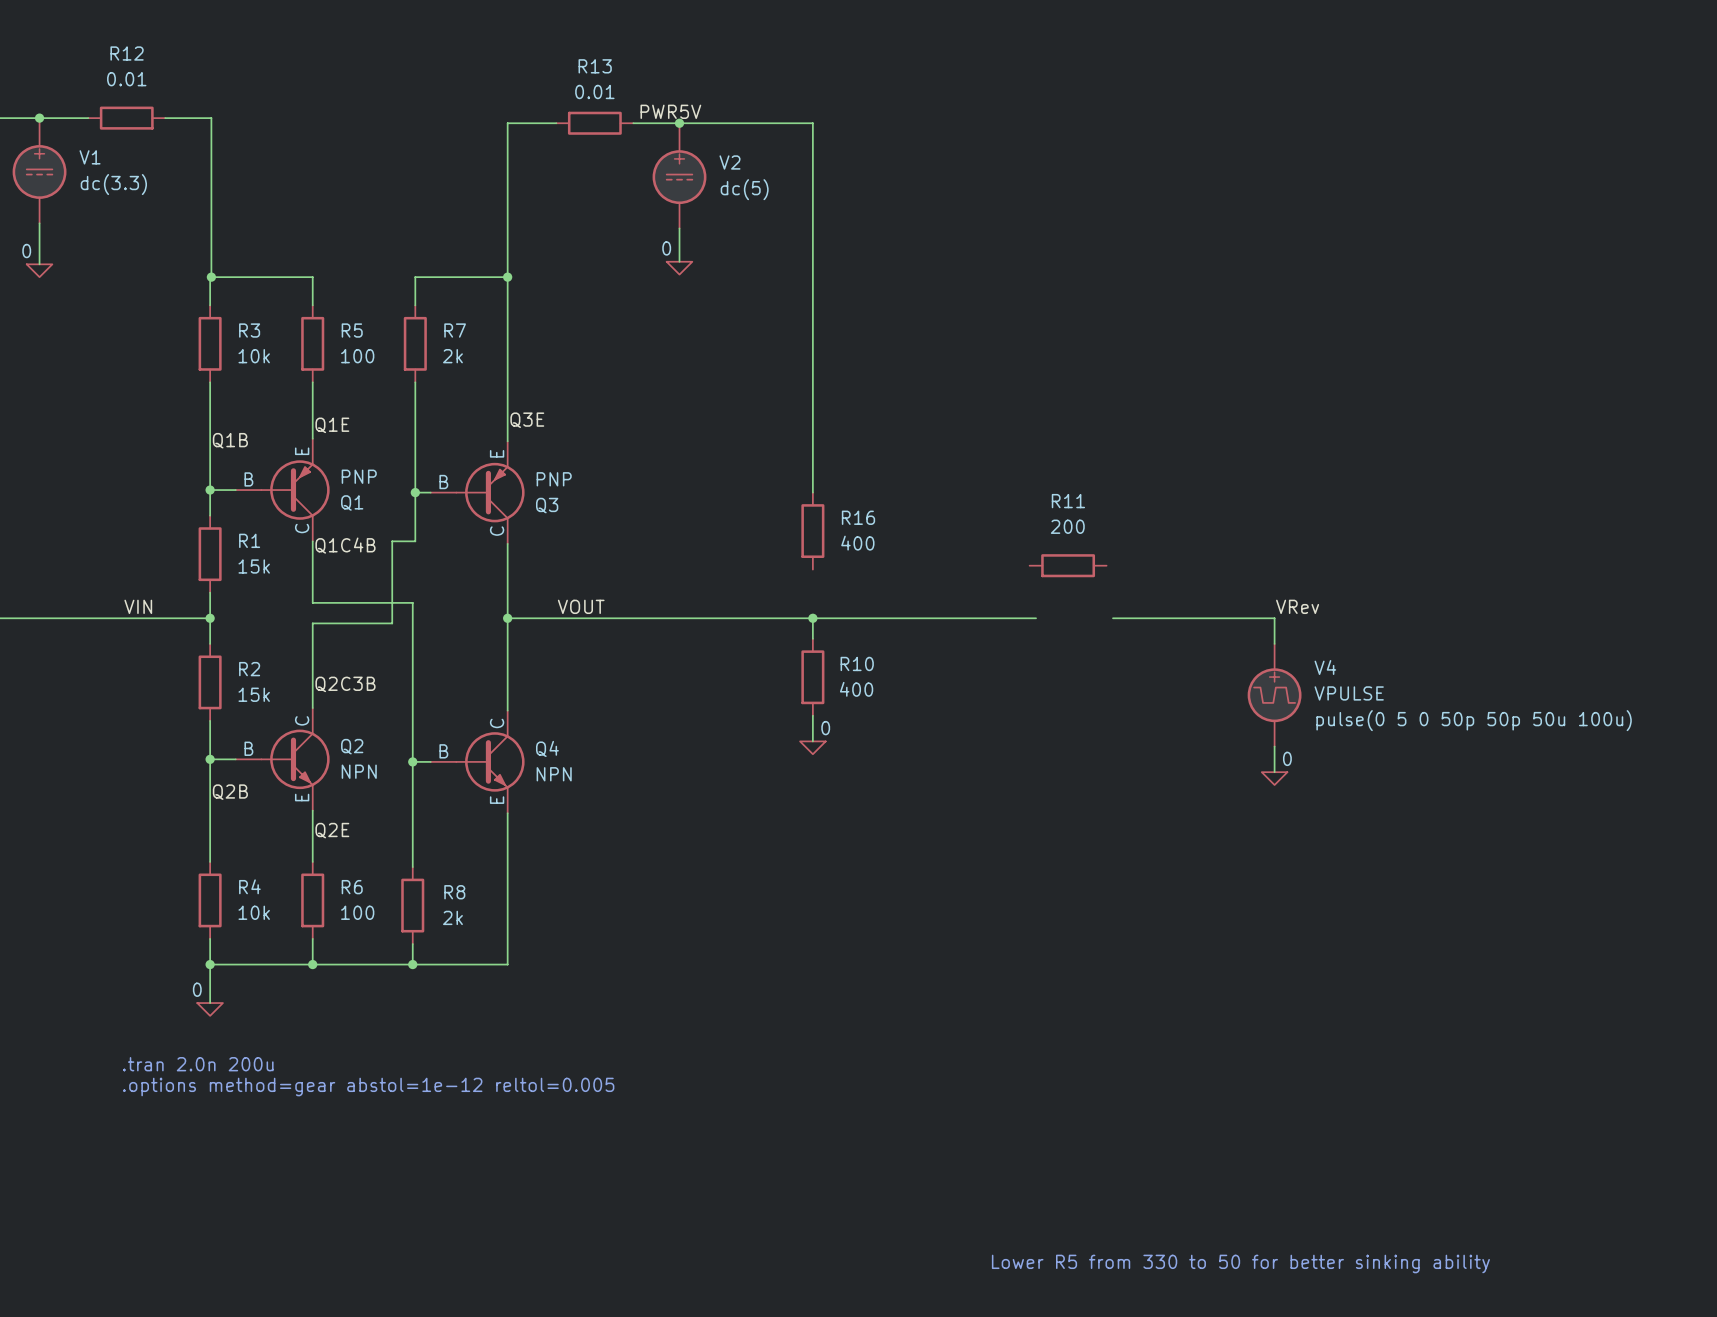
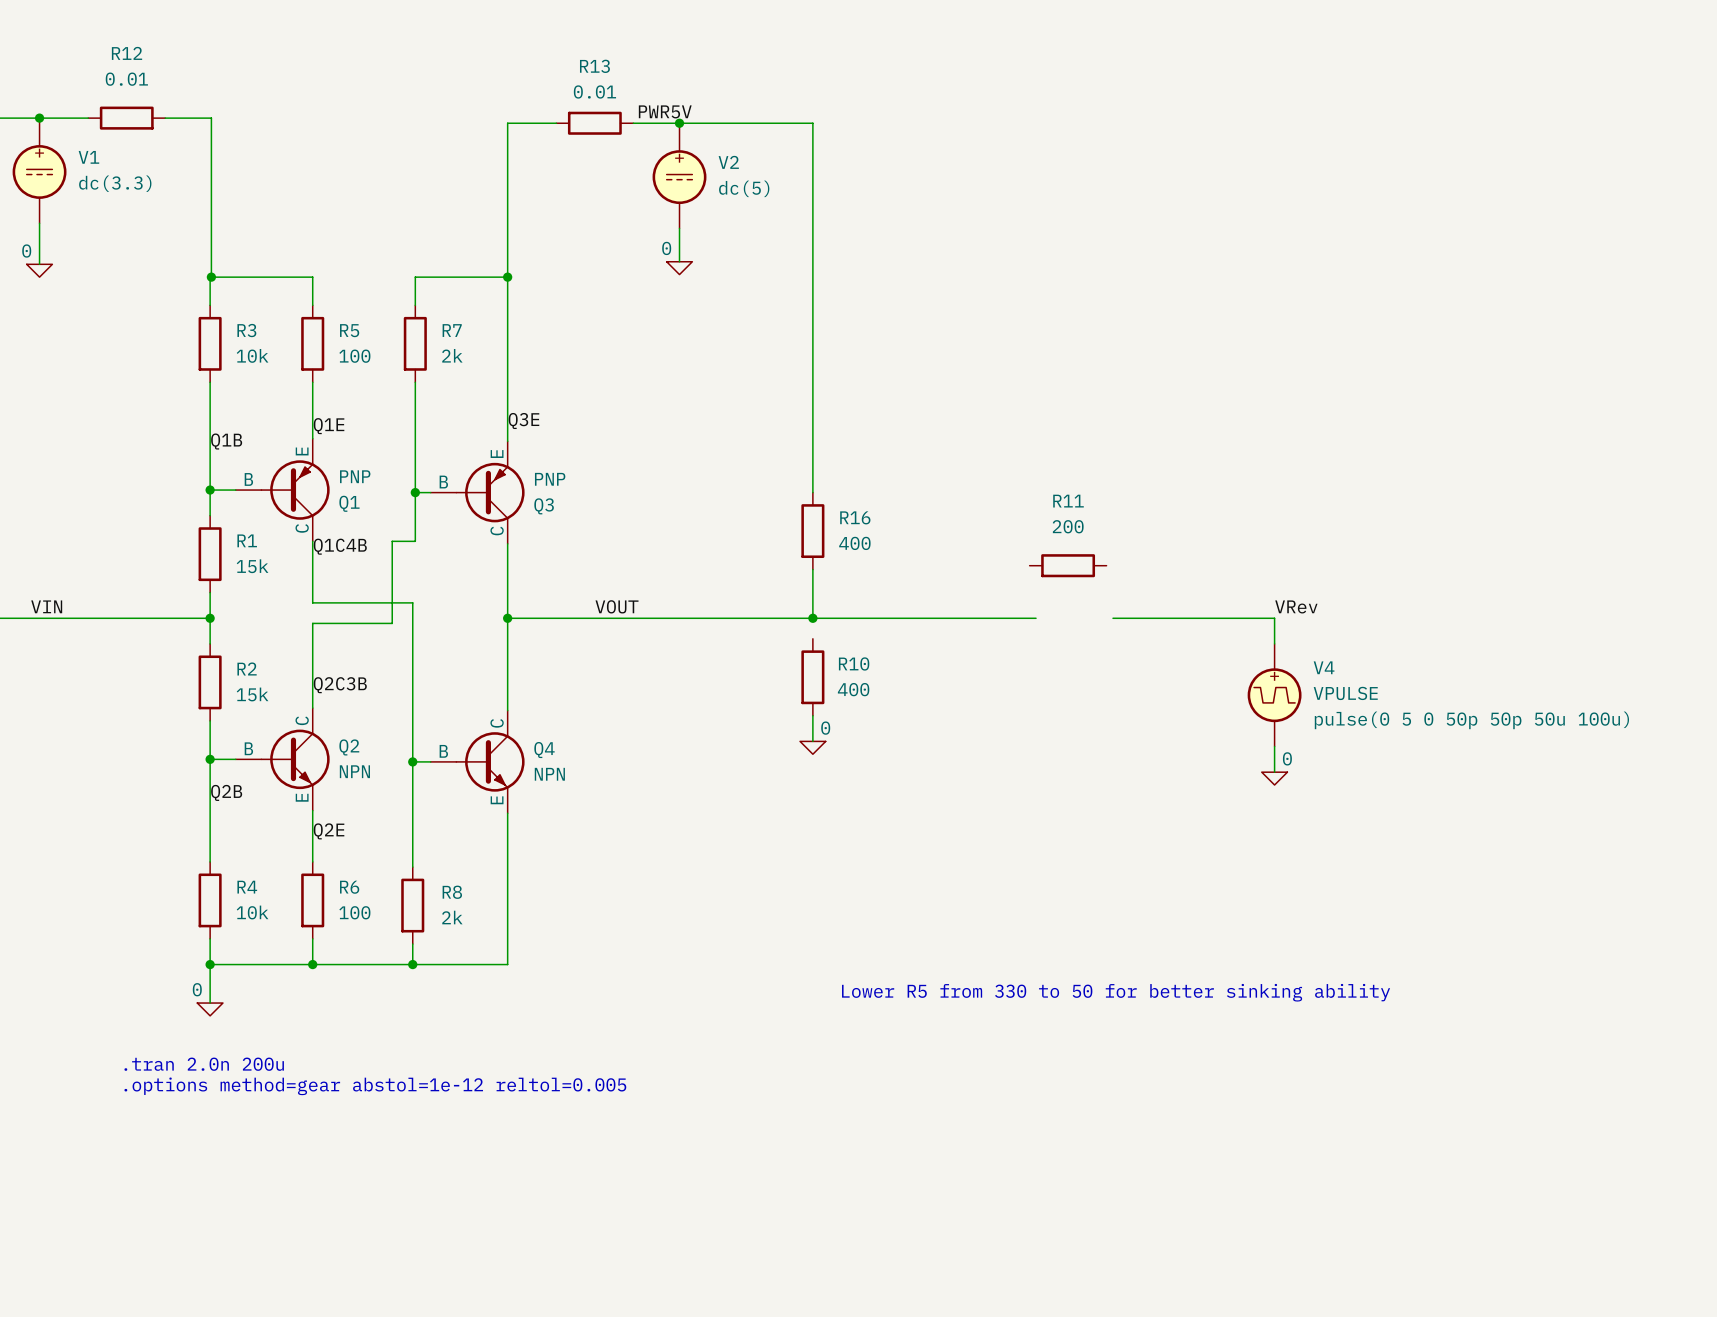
label position: VIN (138, 606) -> VIN (46, 606)
label position: VOUT (581, 606) -> VOUT (617, 606)
wire: (812, 618) (812, 638) -> (812, 618) (812, 569)
text: none -> Lower R5 from 330 to 50 for better sinking ability (1116, 992)
text: Lower R5 from 330 to 50 for better sinking ability (1240, 1263) -> none

